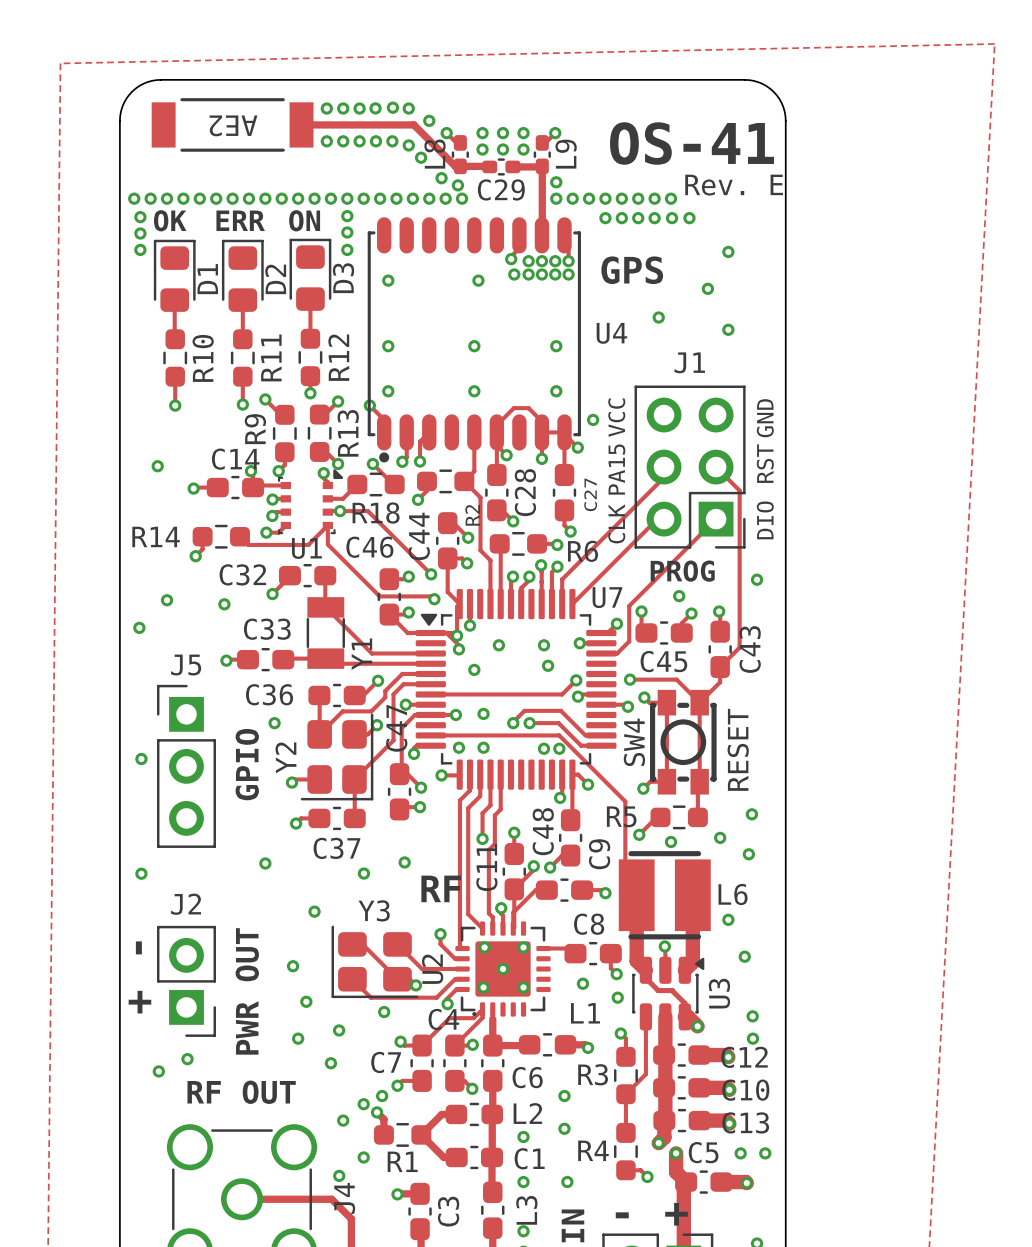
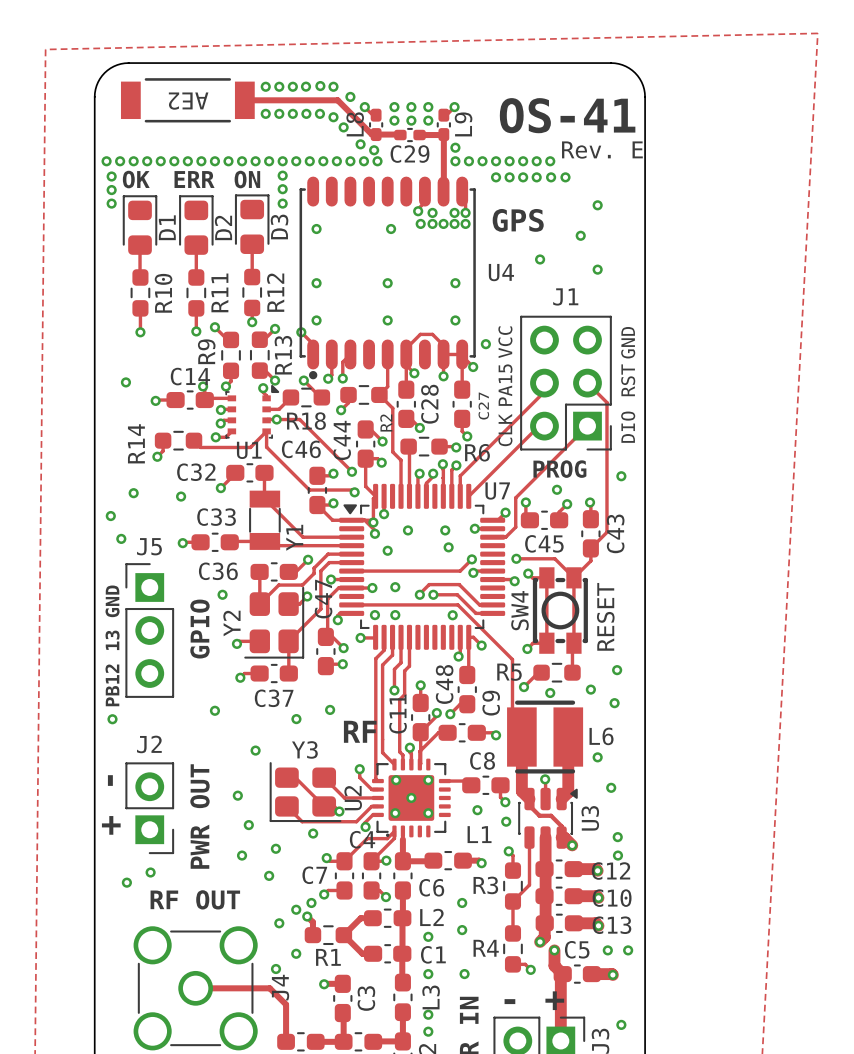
via: (541, 261) -> none
R14 name rotation: 0° (156, 536) -> 90° counterclockwise (136, 443)
via: none -> (452, 615)
via: (543, 748) -> none
via: (559, 748) -> none
via position: (141, 759) -> (121, 538)
text: none -> PB12 13 GND (112, 645)

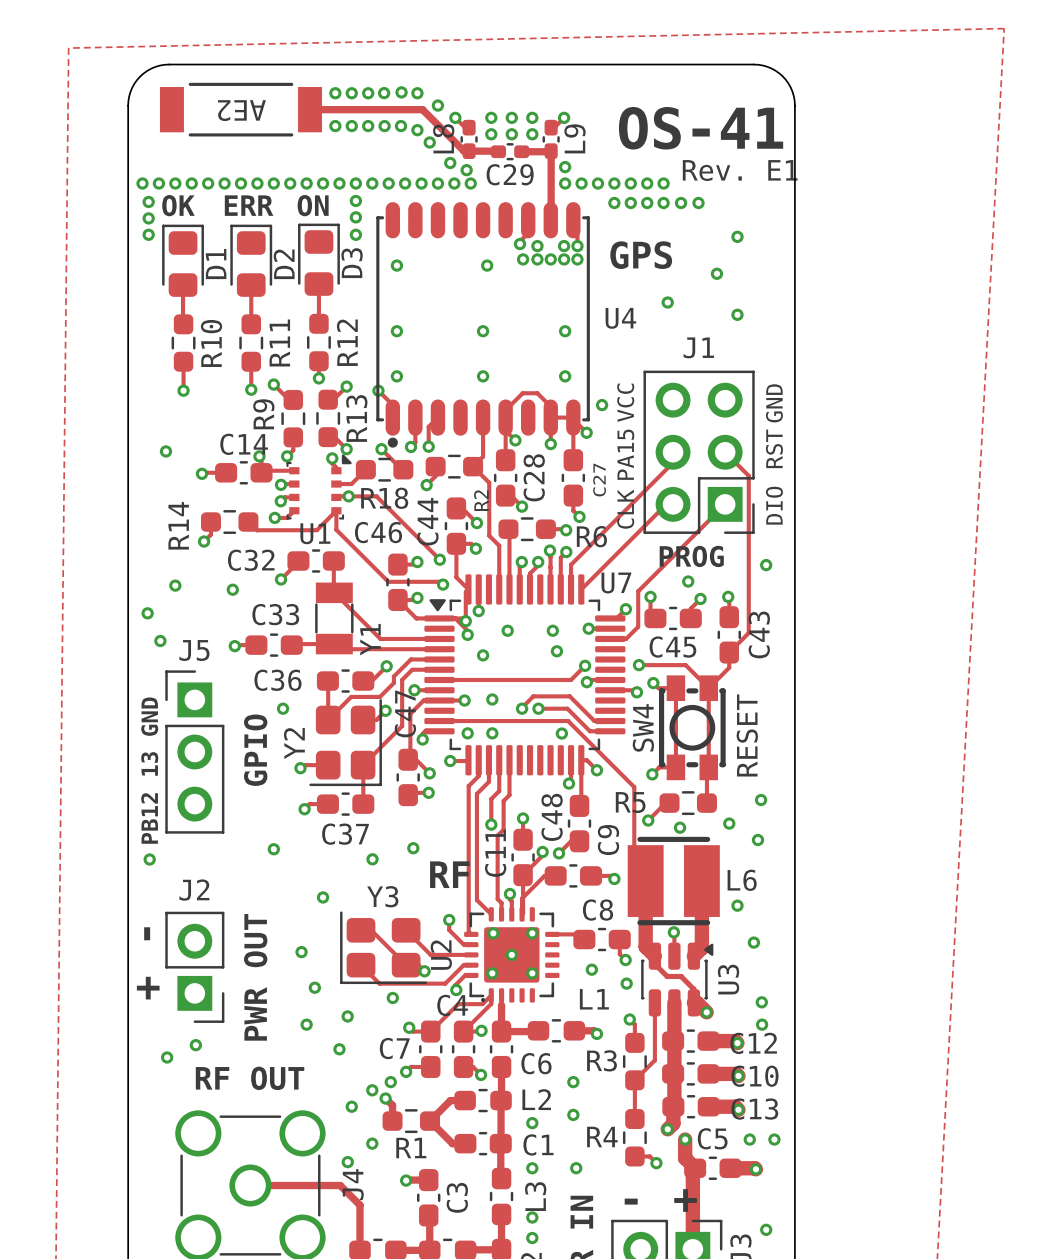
text: Rev. E (602, 150) -> Rev. E1 (740, 170)
via: (550, 161) -> none

